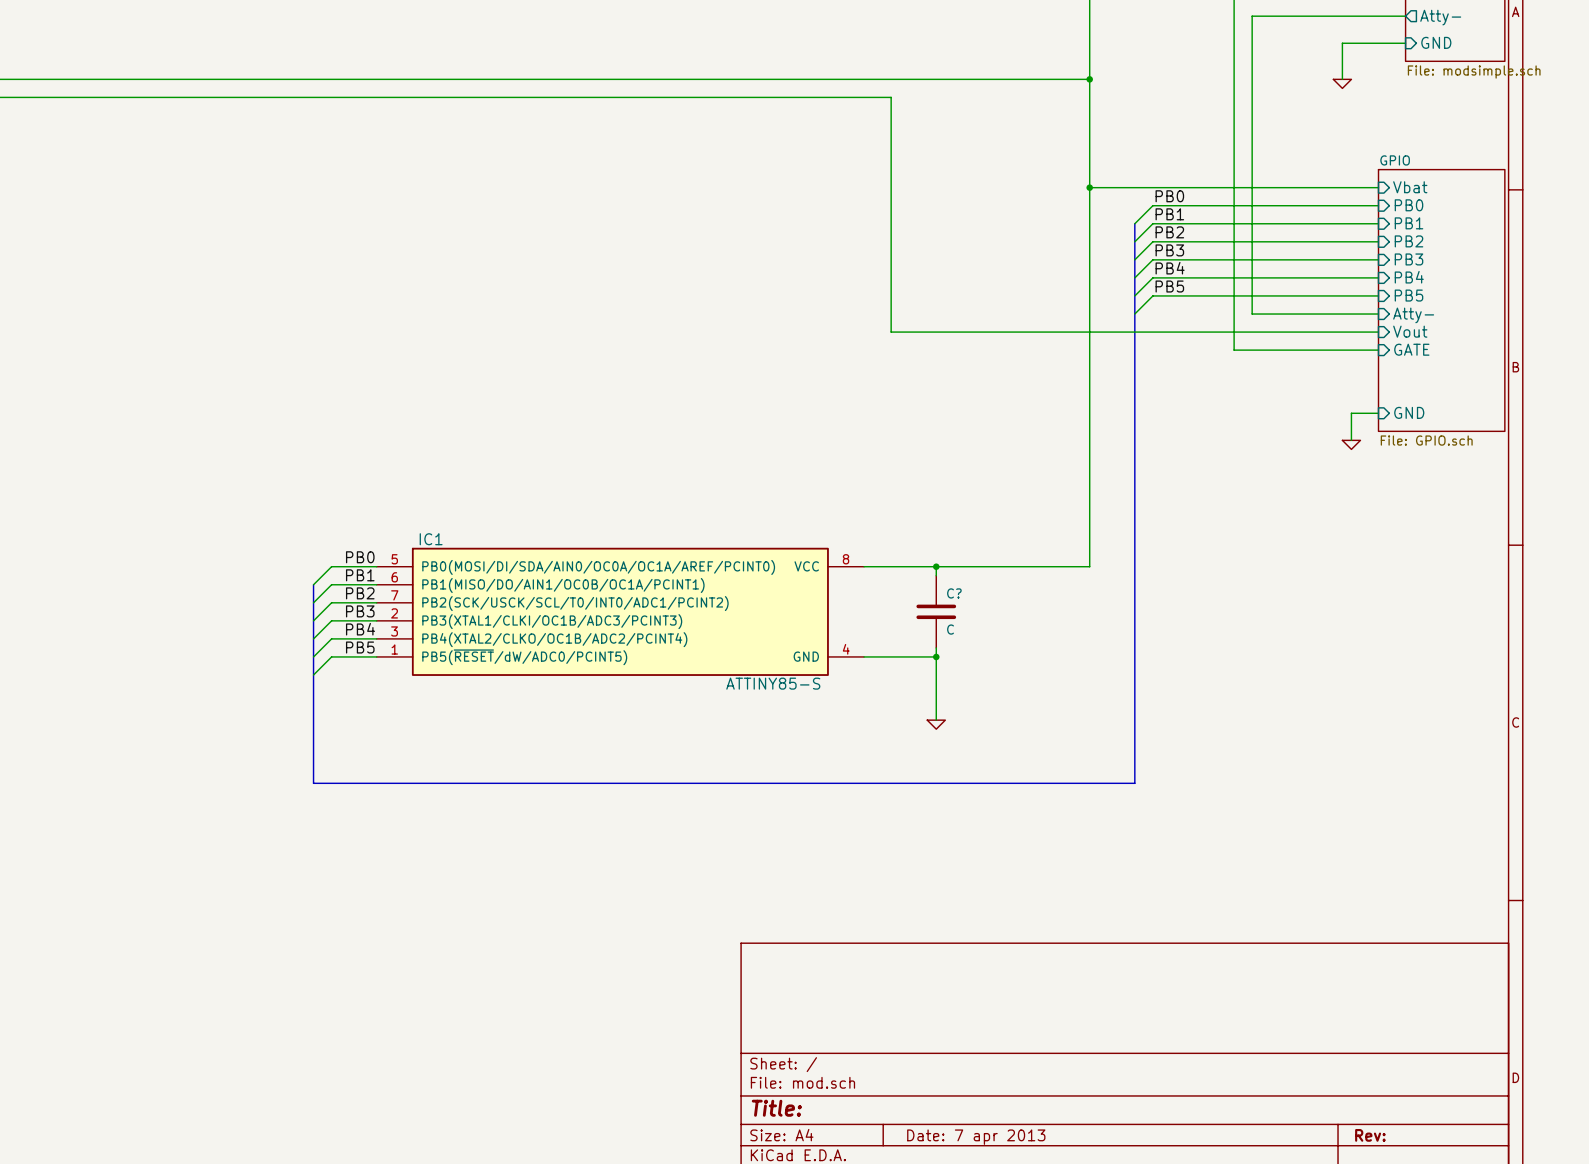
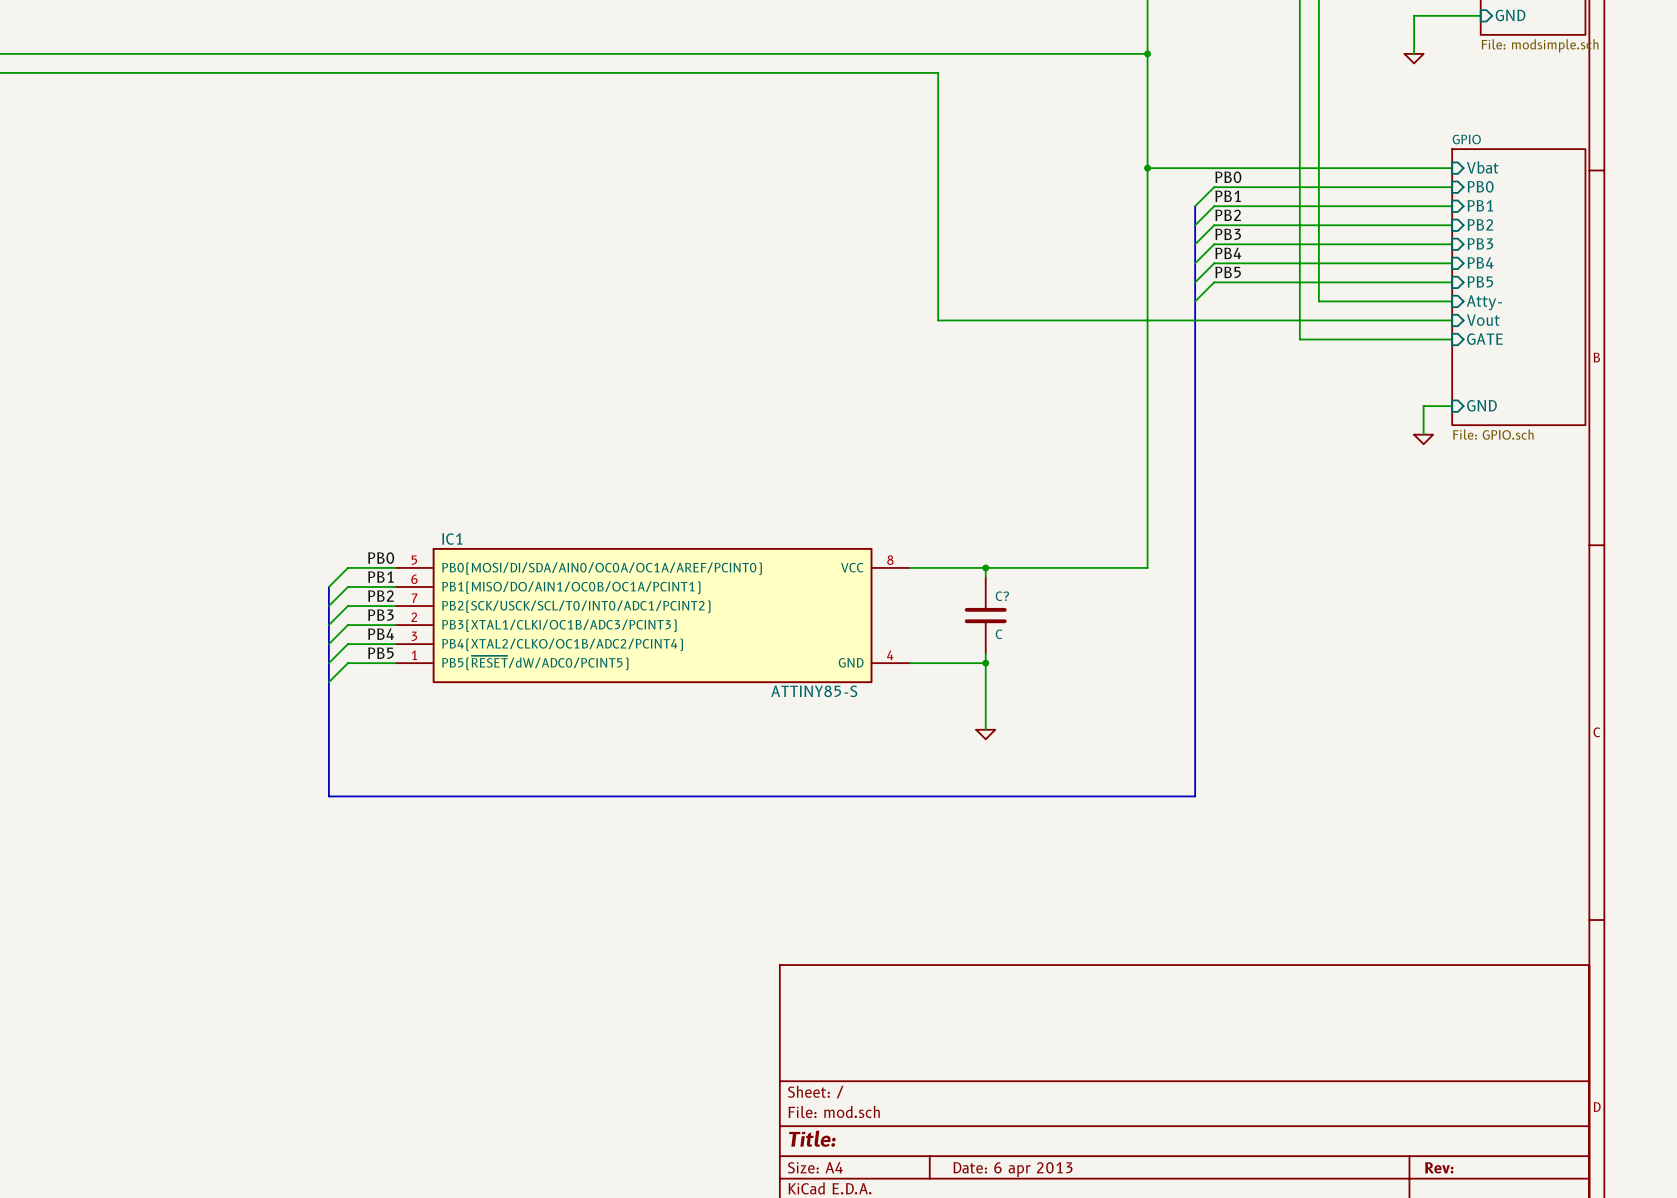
title block: Date: 7 apr 2013 (976, 1137) -> Date: 6 apr 2013 (1013, 1169)

